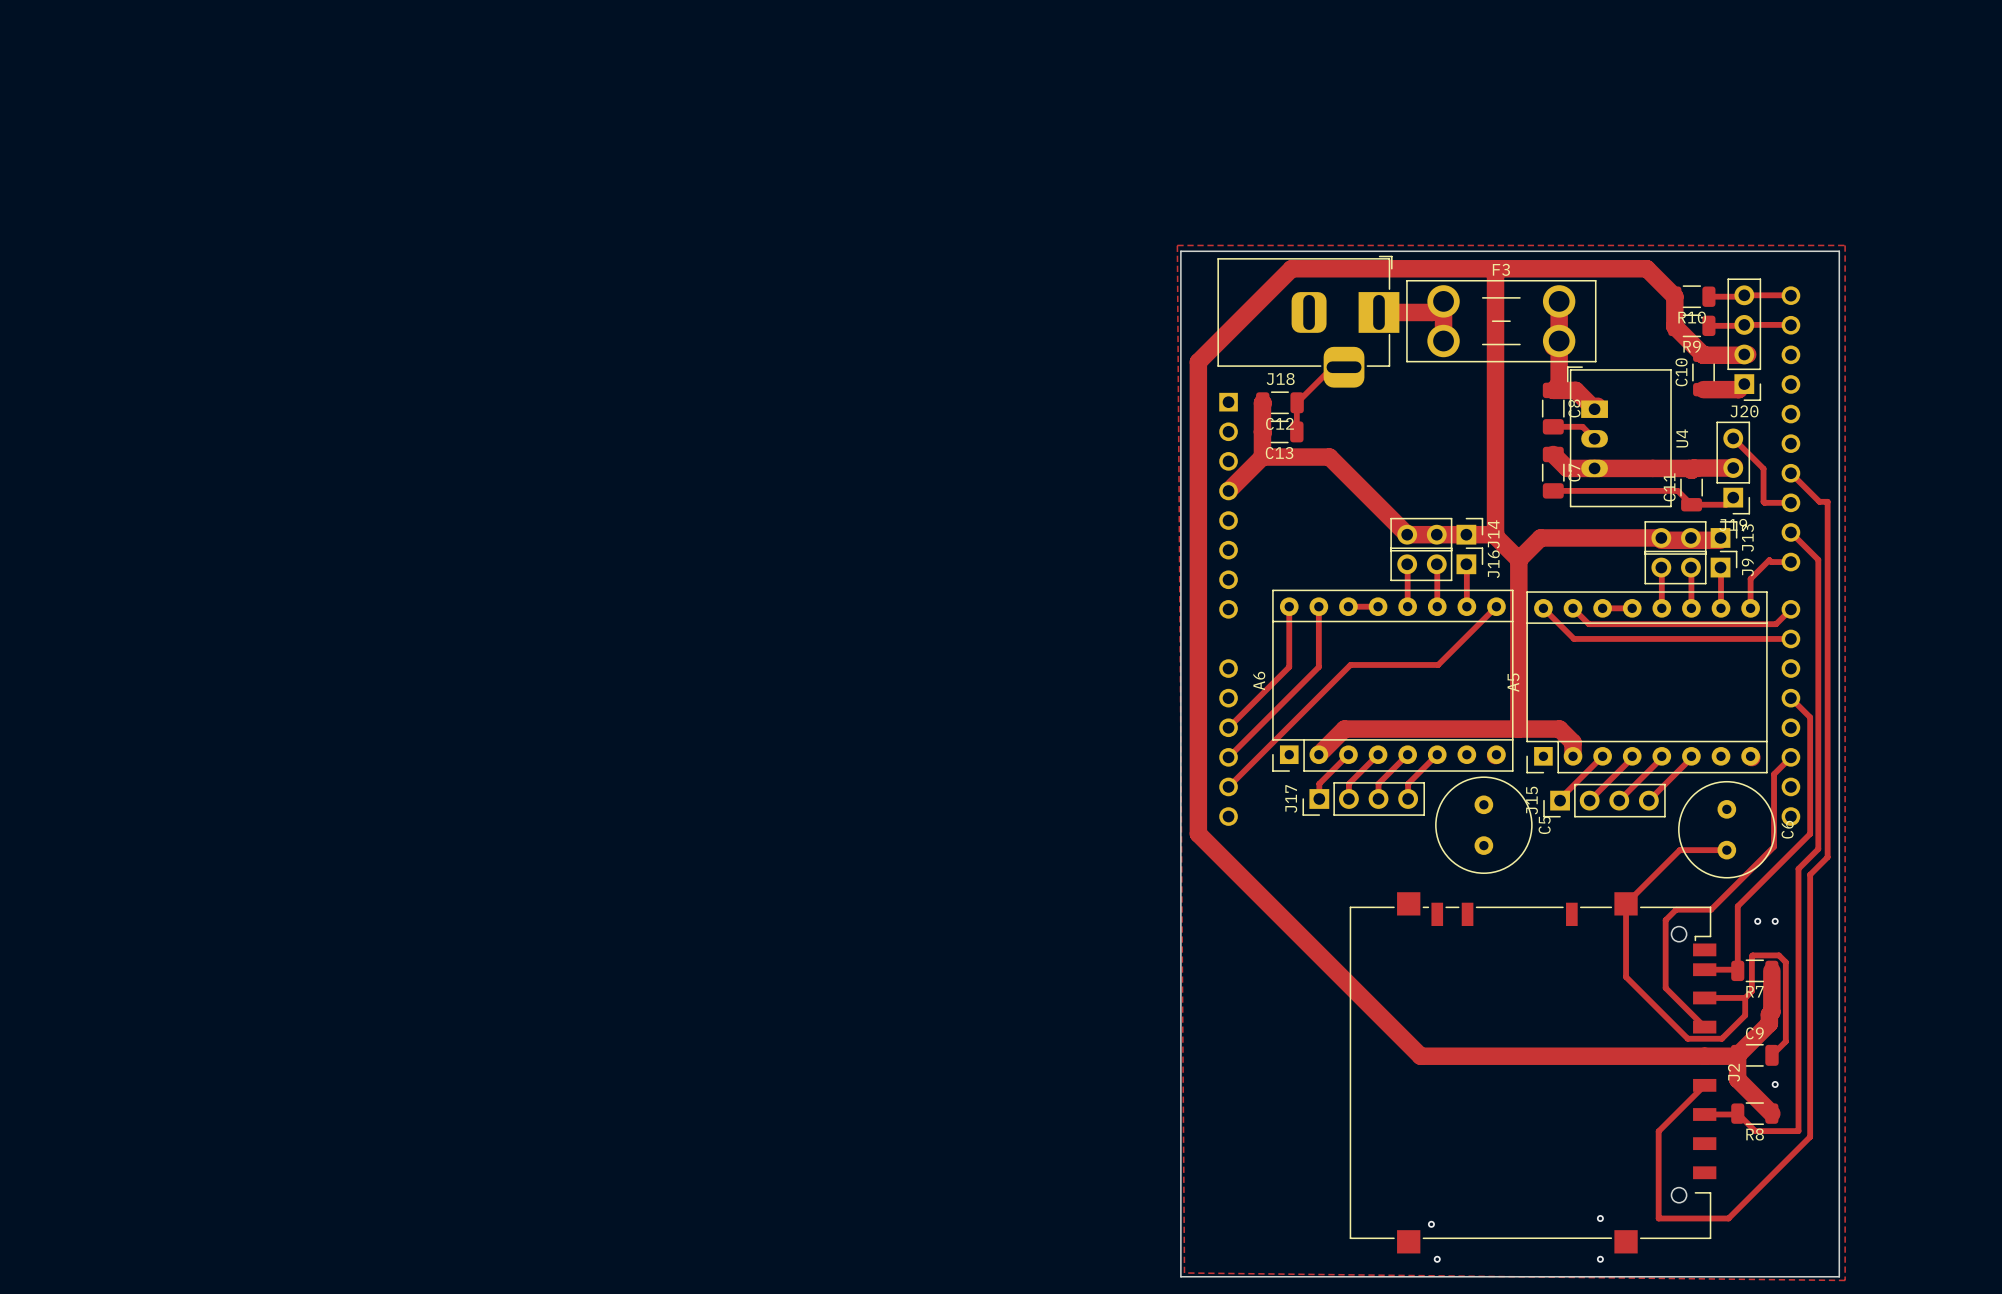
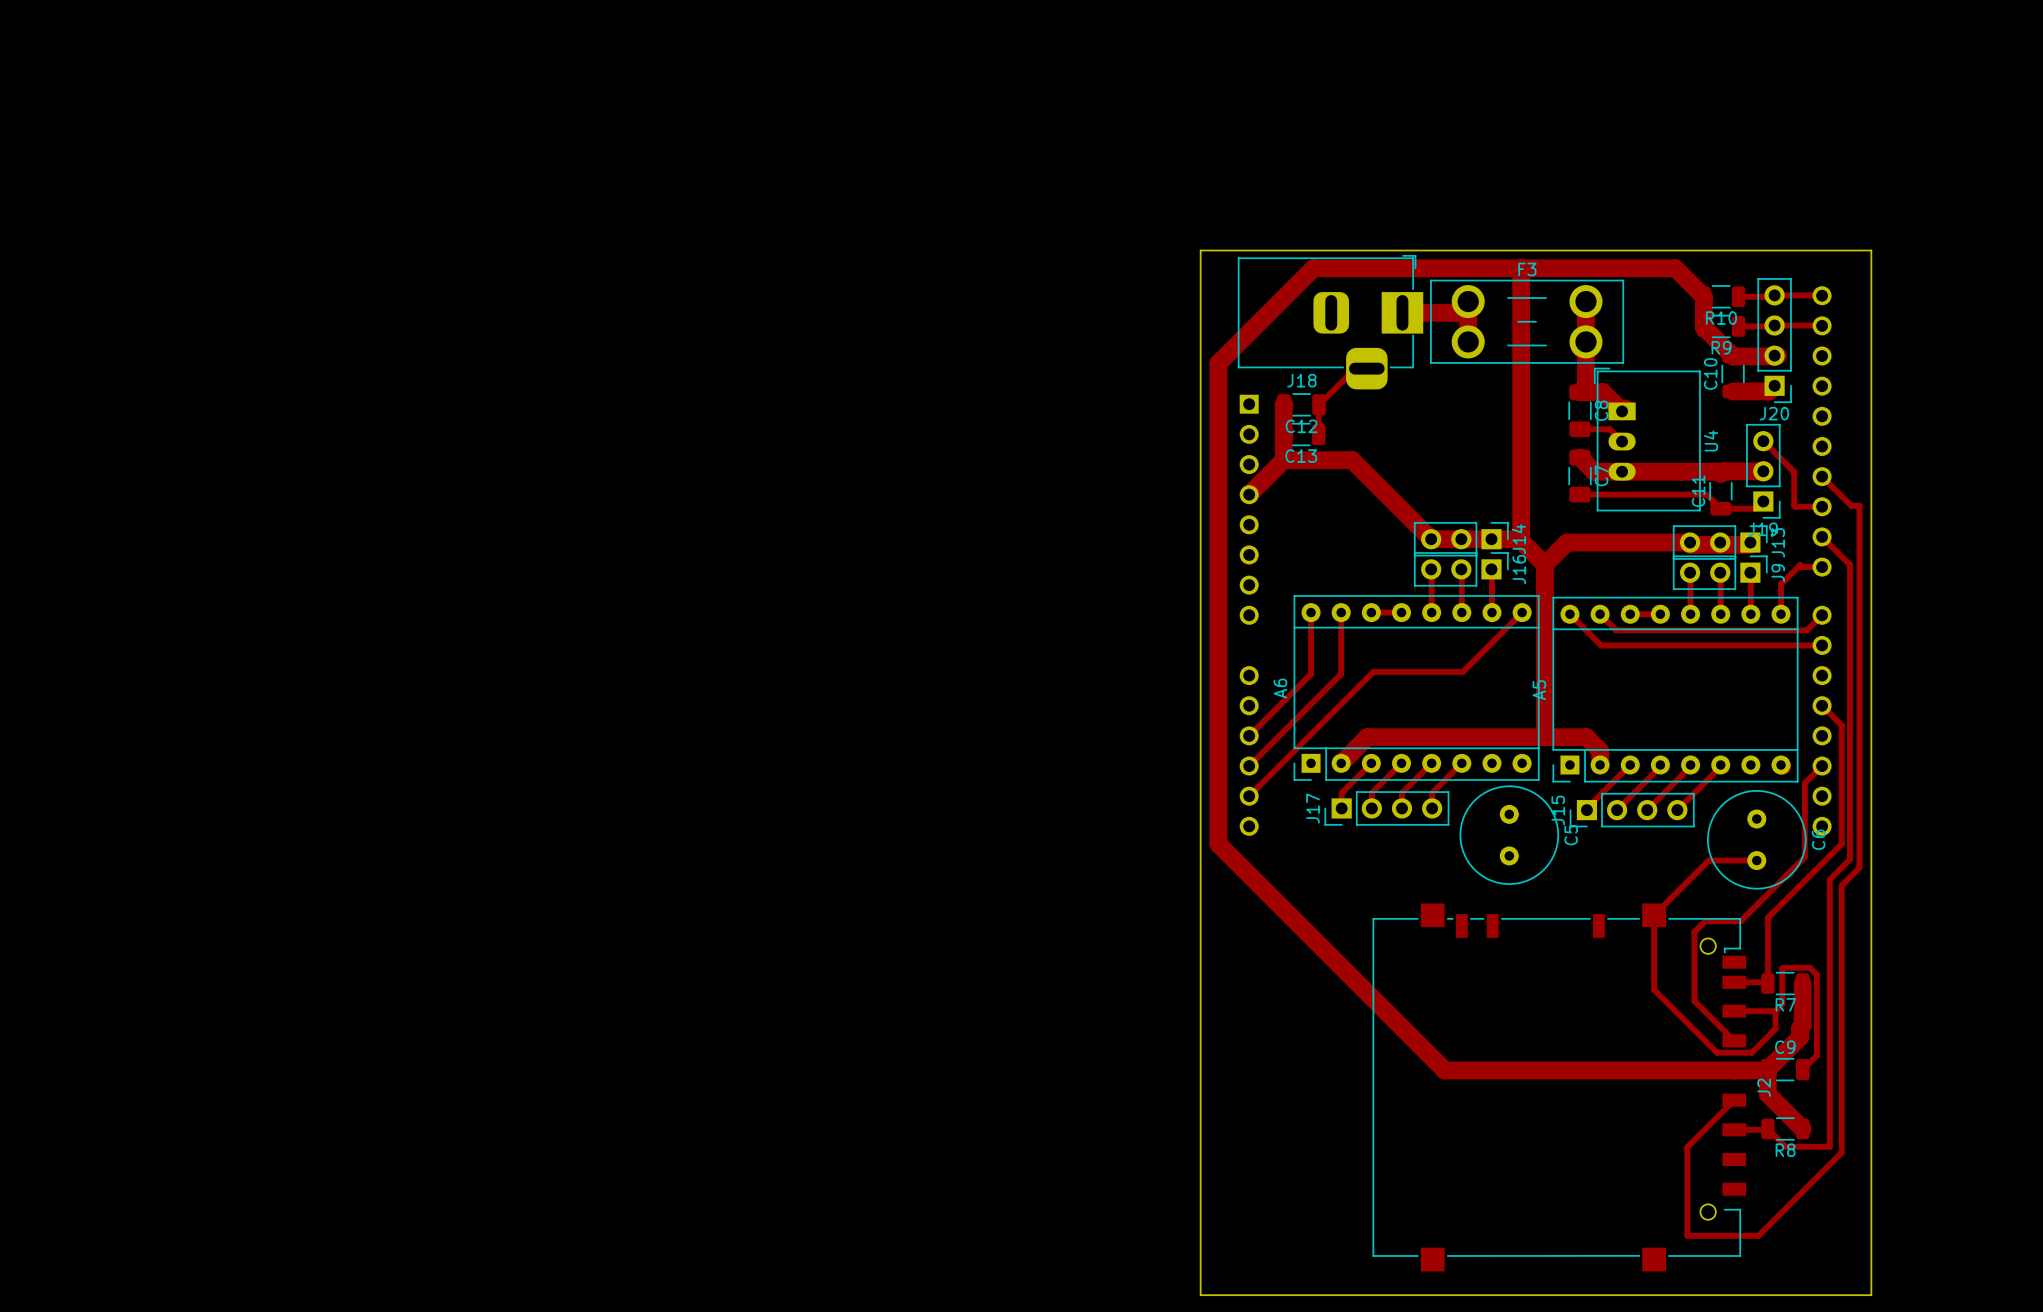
zone outline: (1177, 245) (1845, 245) (1845, 1280) (1184, 1272) (1177, 245) -> none
via: (1757, 921) -> none
via: (1775, 921) -> none
via: (1775, 1084) -> none
via: (1600, 1218) -> none
via: (1431, 1224) -> none
via: (1437, 1259) -> none
via: (1600, 1259) -> none

